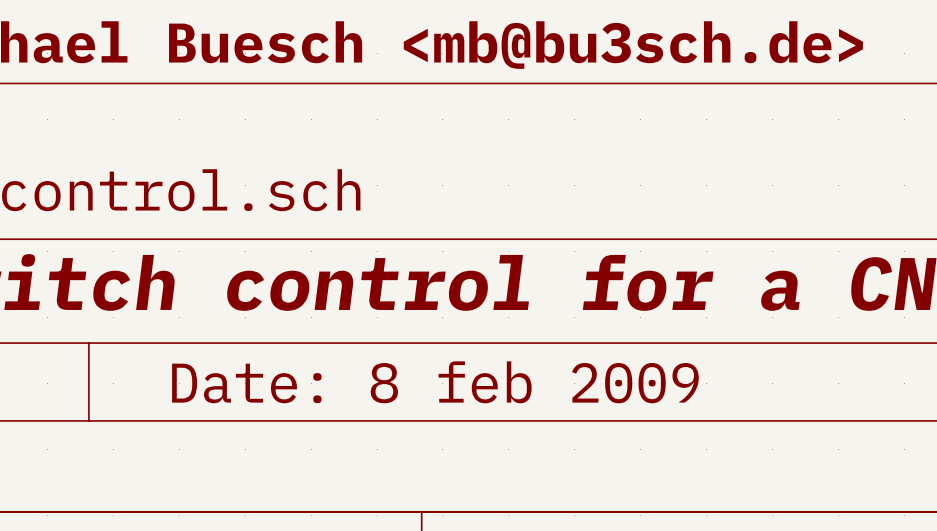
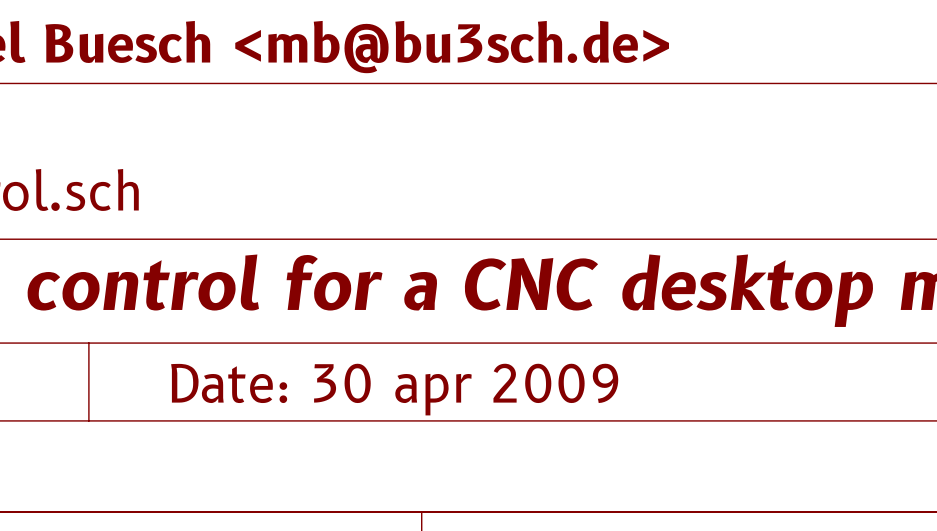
title block: Date: 8 feb 2009 (435, 382) -> Date: 30 apr 2009 (394, 389)

